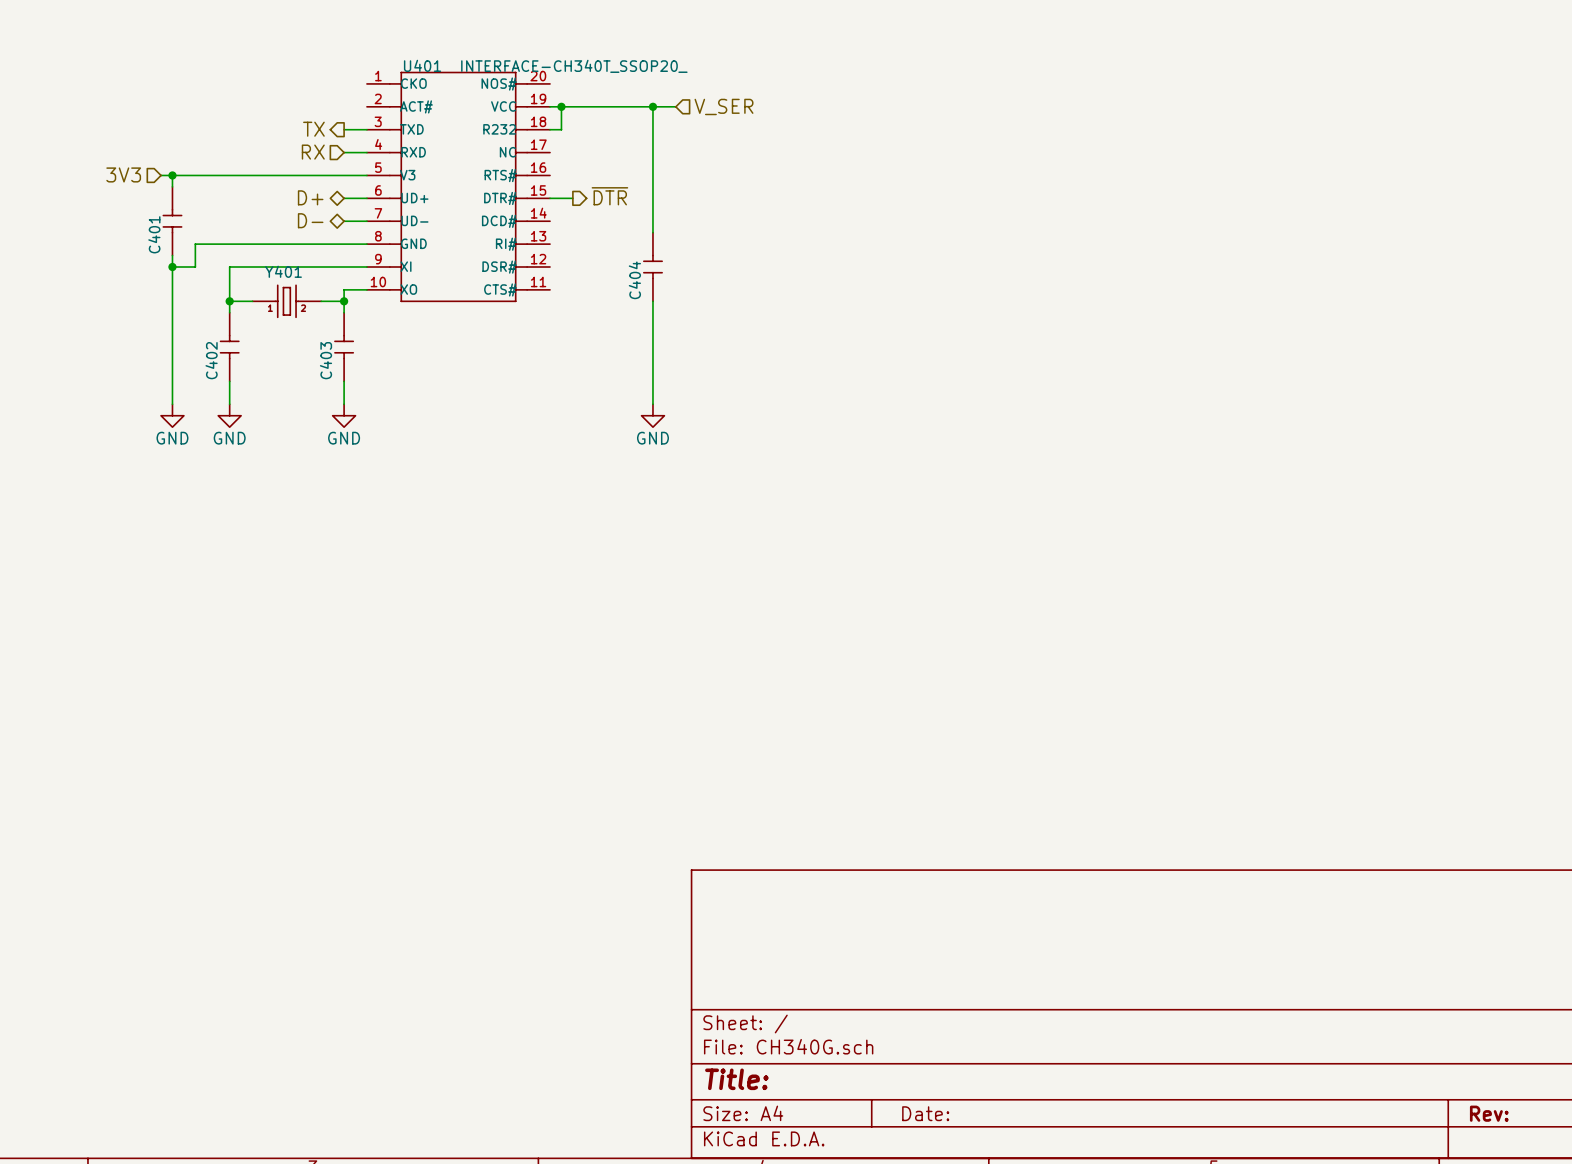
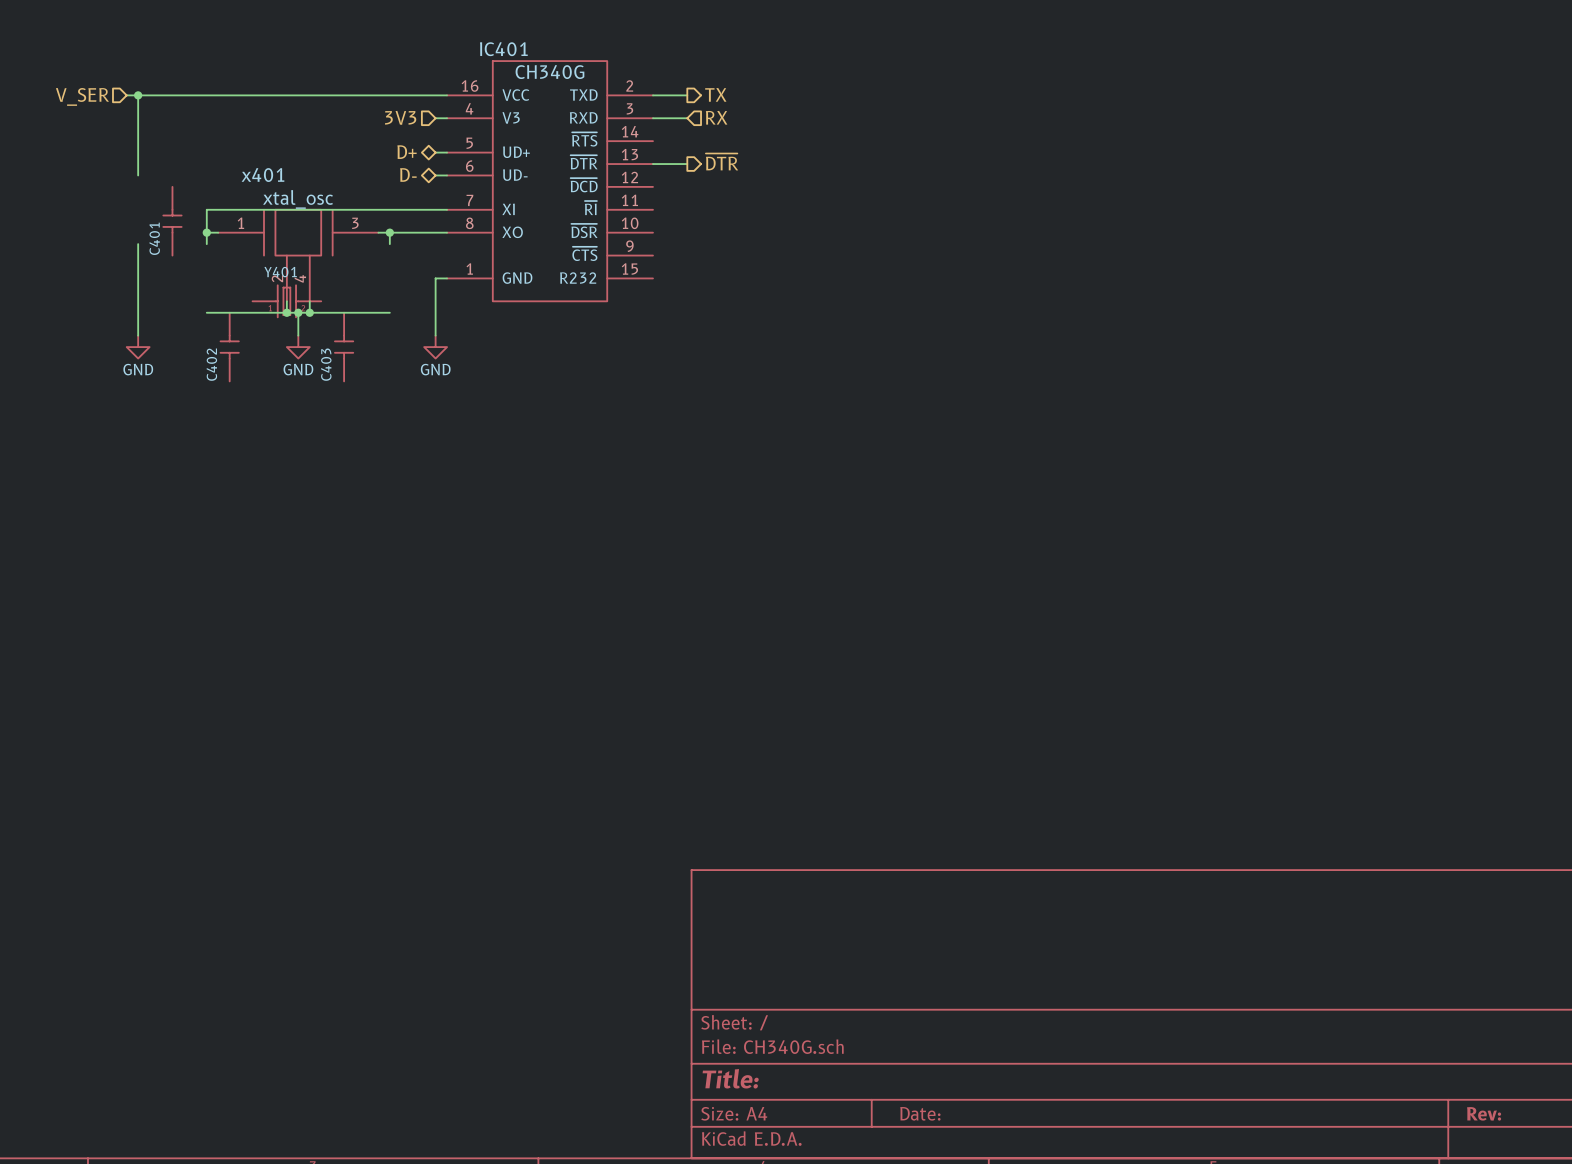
hierarchical label: none -> TX (715, 94)
hierarchical label: none -> V_SER (82, 96)
wire: none -> (126, 95) (447, 95)
wire: none -> (138, 95) (138, 175)
junction: none -> (138, 95)
wire: none -> (652, 95) (687, 95)
wire: (550, 106) (675, 106) -> none
wire: (561, 106) (561, 129) (550, 129) -> none
junction: (561, 106) -> none
wire: (652, 106) (652, 232) -> none
junction: (652, 106) -> none
hierarchical label: V_SER (724, 106) -> none
hierarchical label: none -> 3V3 (400, 117)
hierarchical label: none -> RX (716, 117)
wire: none -> (435, 118) (447, 118)
wire: none -> (652, 118) (687, 118)
hierarchical label: TX (313, 129) -> none
wire: (344, 129) (366, 129) -> none
hierarchical label: RX (313, 152) -> none
wire: (344, 152) (366, 152) -> none
wire: none -> (435, 152) (447, 152)
wire: none -> (652, 164) (687, 164)
hierarchical label: 3V3 (123, 174) -> none
wire: (161, 175) (366, 175) -> none
wire: (172, 175) (172, 186) -> (286, 301) (286, 312)
junction: (172, 175) -> none
wire: none -> (435, 175) (447, 175)
IC401: none -> CH340G (550, 181)
U401: INTERFACE-CH340T_SSOP20_ (458, 186) -> none
hierarchical label position: ~{DTR} (609, 196) -> ~{DTR} (722, 161)
hierarchical label position: D+ (310, 197) -> D+ (407, 152)
wire: (344, 198) (366, 198) -> none
wire: (550, 198) (572, 198) -> none
wire: none -> (447, 209) (206, 209) (206, 244)
hierarchical label position: D- (310, 220) -> D- (408, 175)
wire: (344, 221) (366, 221) -> none
wire: none -> (206, 232) (218, 232)
junction: none -> (206, 232)
wire: none -> (378, 232) (447, 232)
wire: none -> (389, 232) (389, 244)
junction: none -> (389, 232)
wire: none -> (138, 244) (138, 335)
wire: (366, 244) (195, 244) (195, 266) (172, 266) -> none
wire: (172, 255) (172, 404) -> none
x401: none -> xtal_osc (298, 255)
junction: (172, 266) -> none
wire: (366, 266) (229, 266) (229, 312) -> none
C404: (652, 266) -> none
wire: none -> (447, 278) (435, 278) (435, 335)
wire: (366, 289) (344, 289) (344, 312) -> none
wire: (229, 301) (252, 301) -> none
junction: (229, 301) -> none
wire: none -> (309, 301) (309, 312)
wire: (321, 301) (344, 301) -> none
junction: (344, 301) -> none
wire: (652, 301) (652, 404) -> none
wire: none -> (206, 312) (389, 312)
junction: none -> (286, 312)
junction: none -> (298, 312)
junction: none -> (309, 312)
power symbol: none -> GND (138, 347)
power symbol: none -> GND (298, 347)
power symbol: none -> GND (435, 347)
wire: (229, 381) (229, 404) -> none
wire: (344, 381) (344, 404) -> (298, 312) (298, 335)
power symbol: GND (172, 415) -> none
power symbol: GND (229, 415) -> none
power symbol: GND (344, 415) -> none
power symbol: GND (652, 415) -> none

